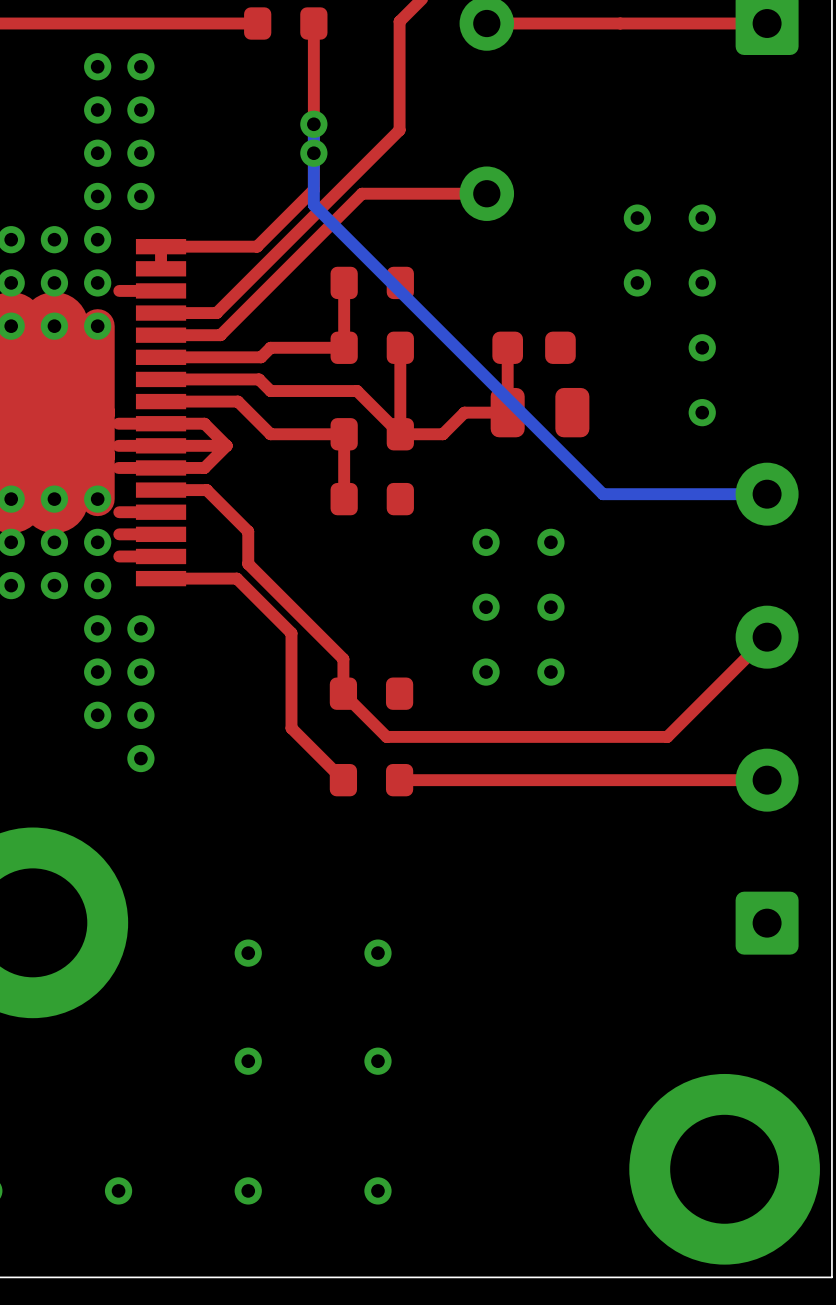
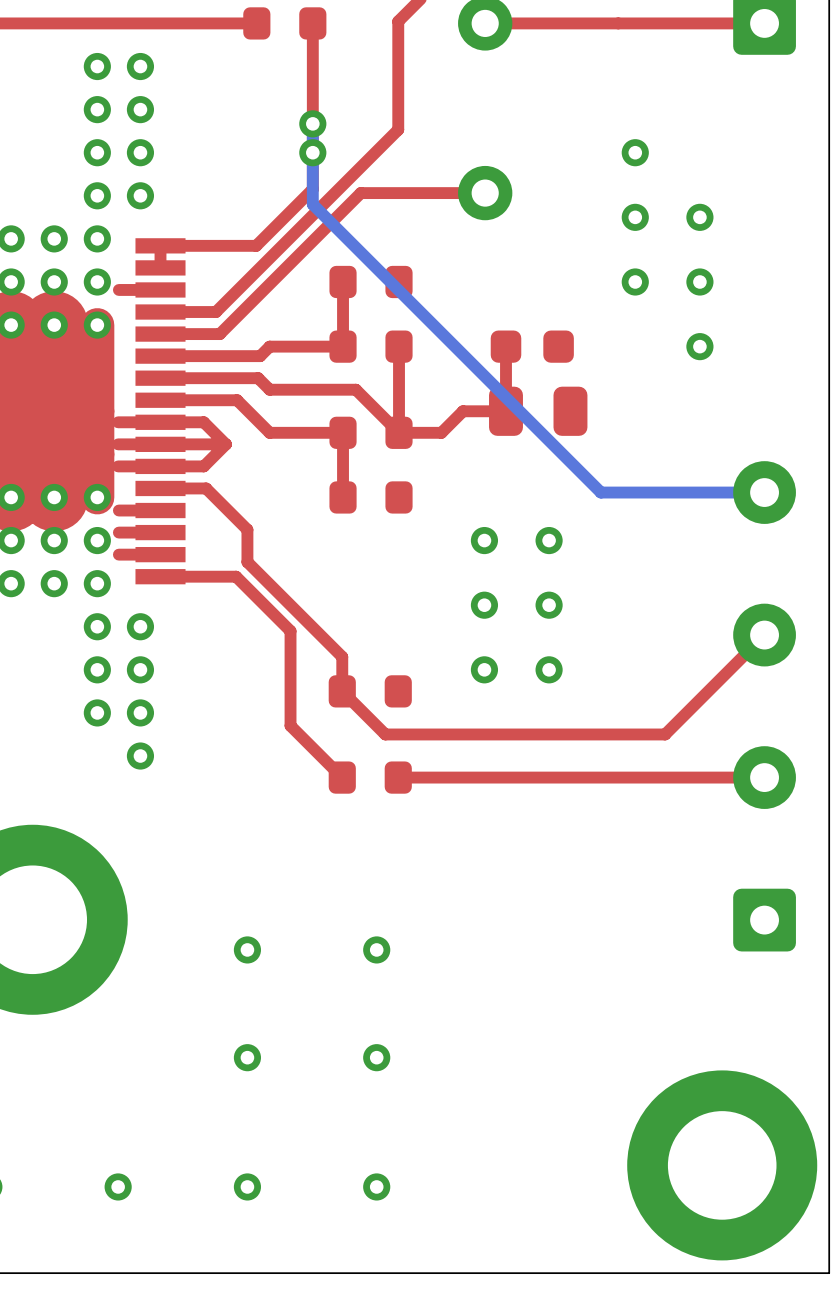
via: none -> (635, 152)
via: (702, 412) -> none

